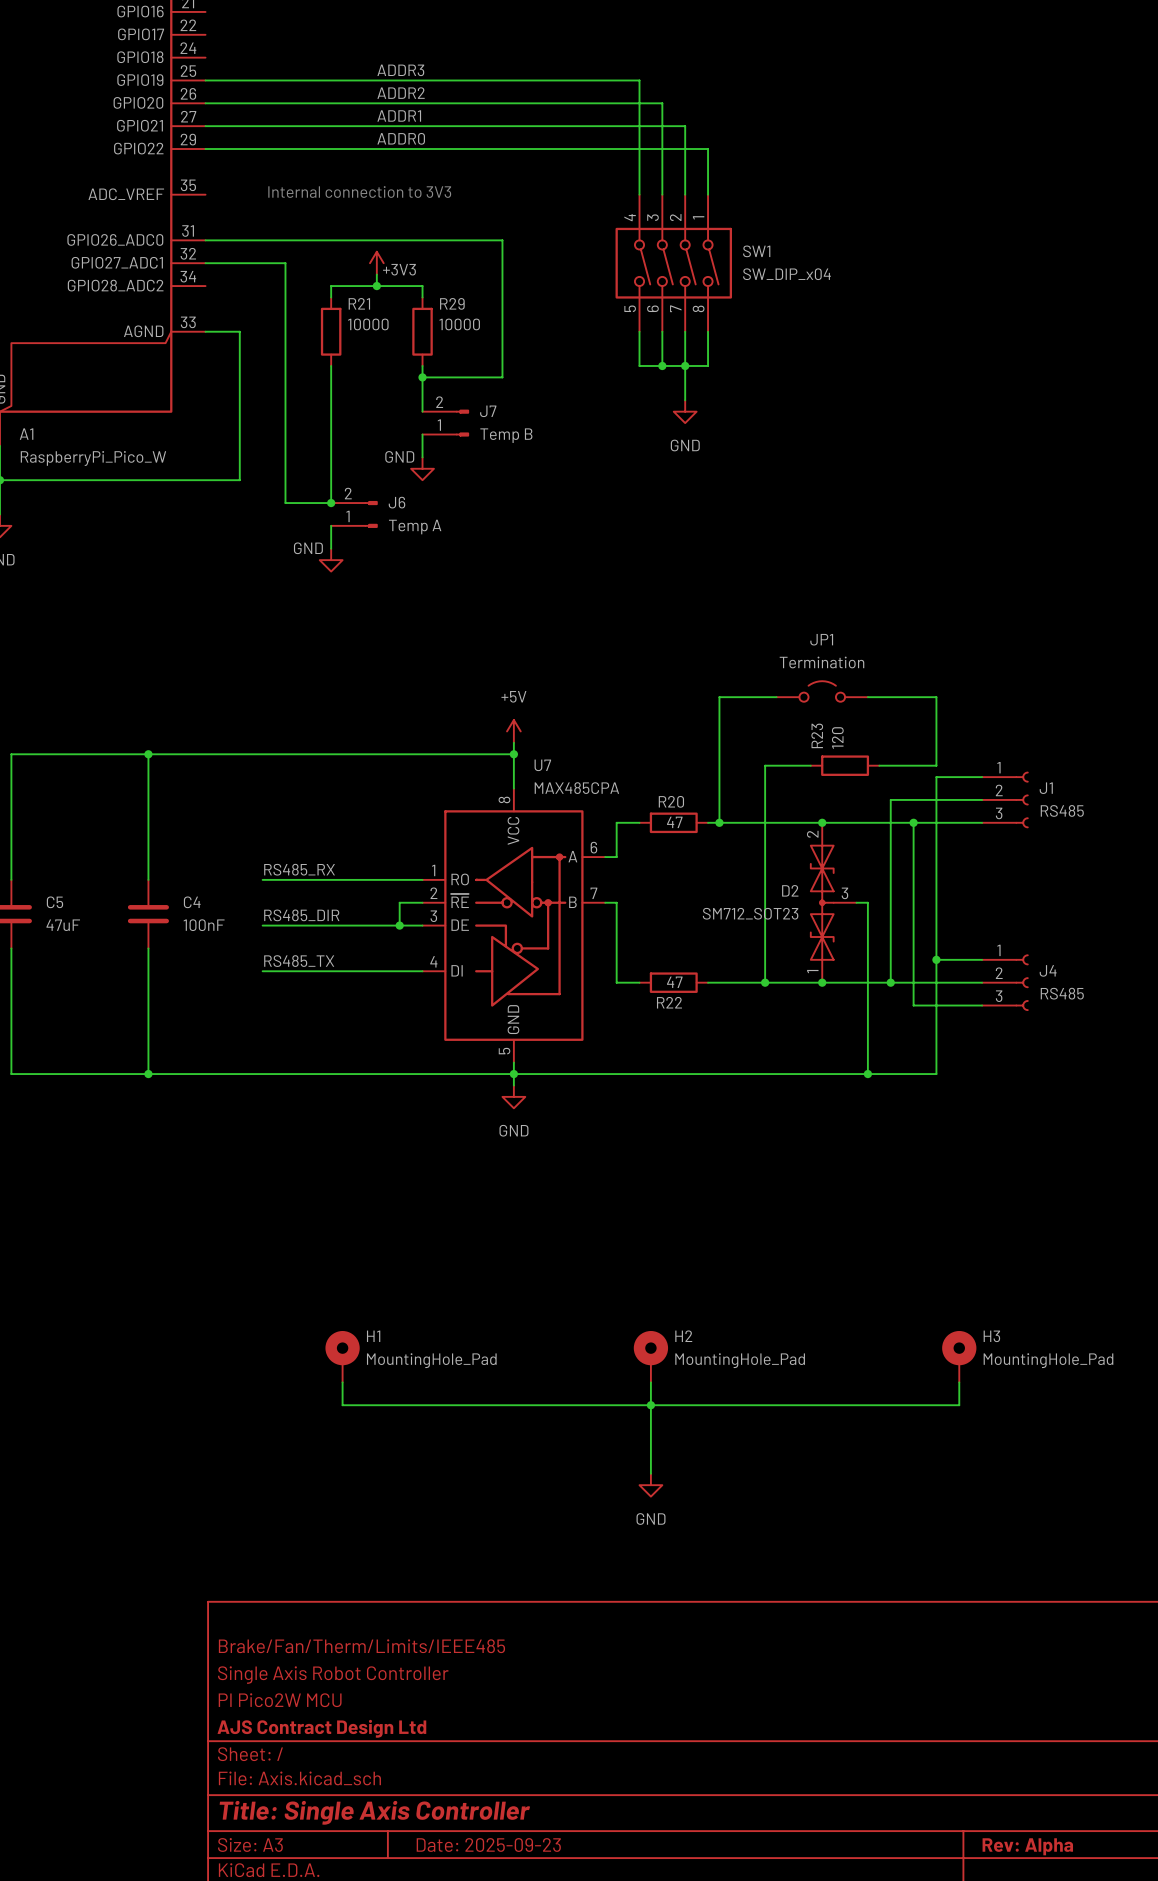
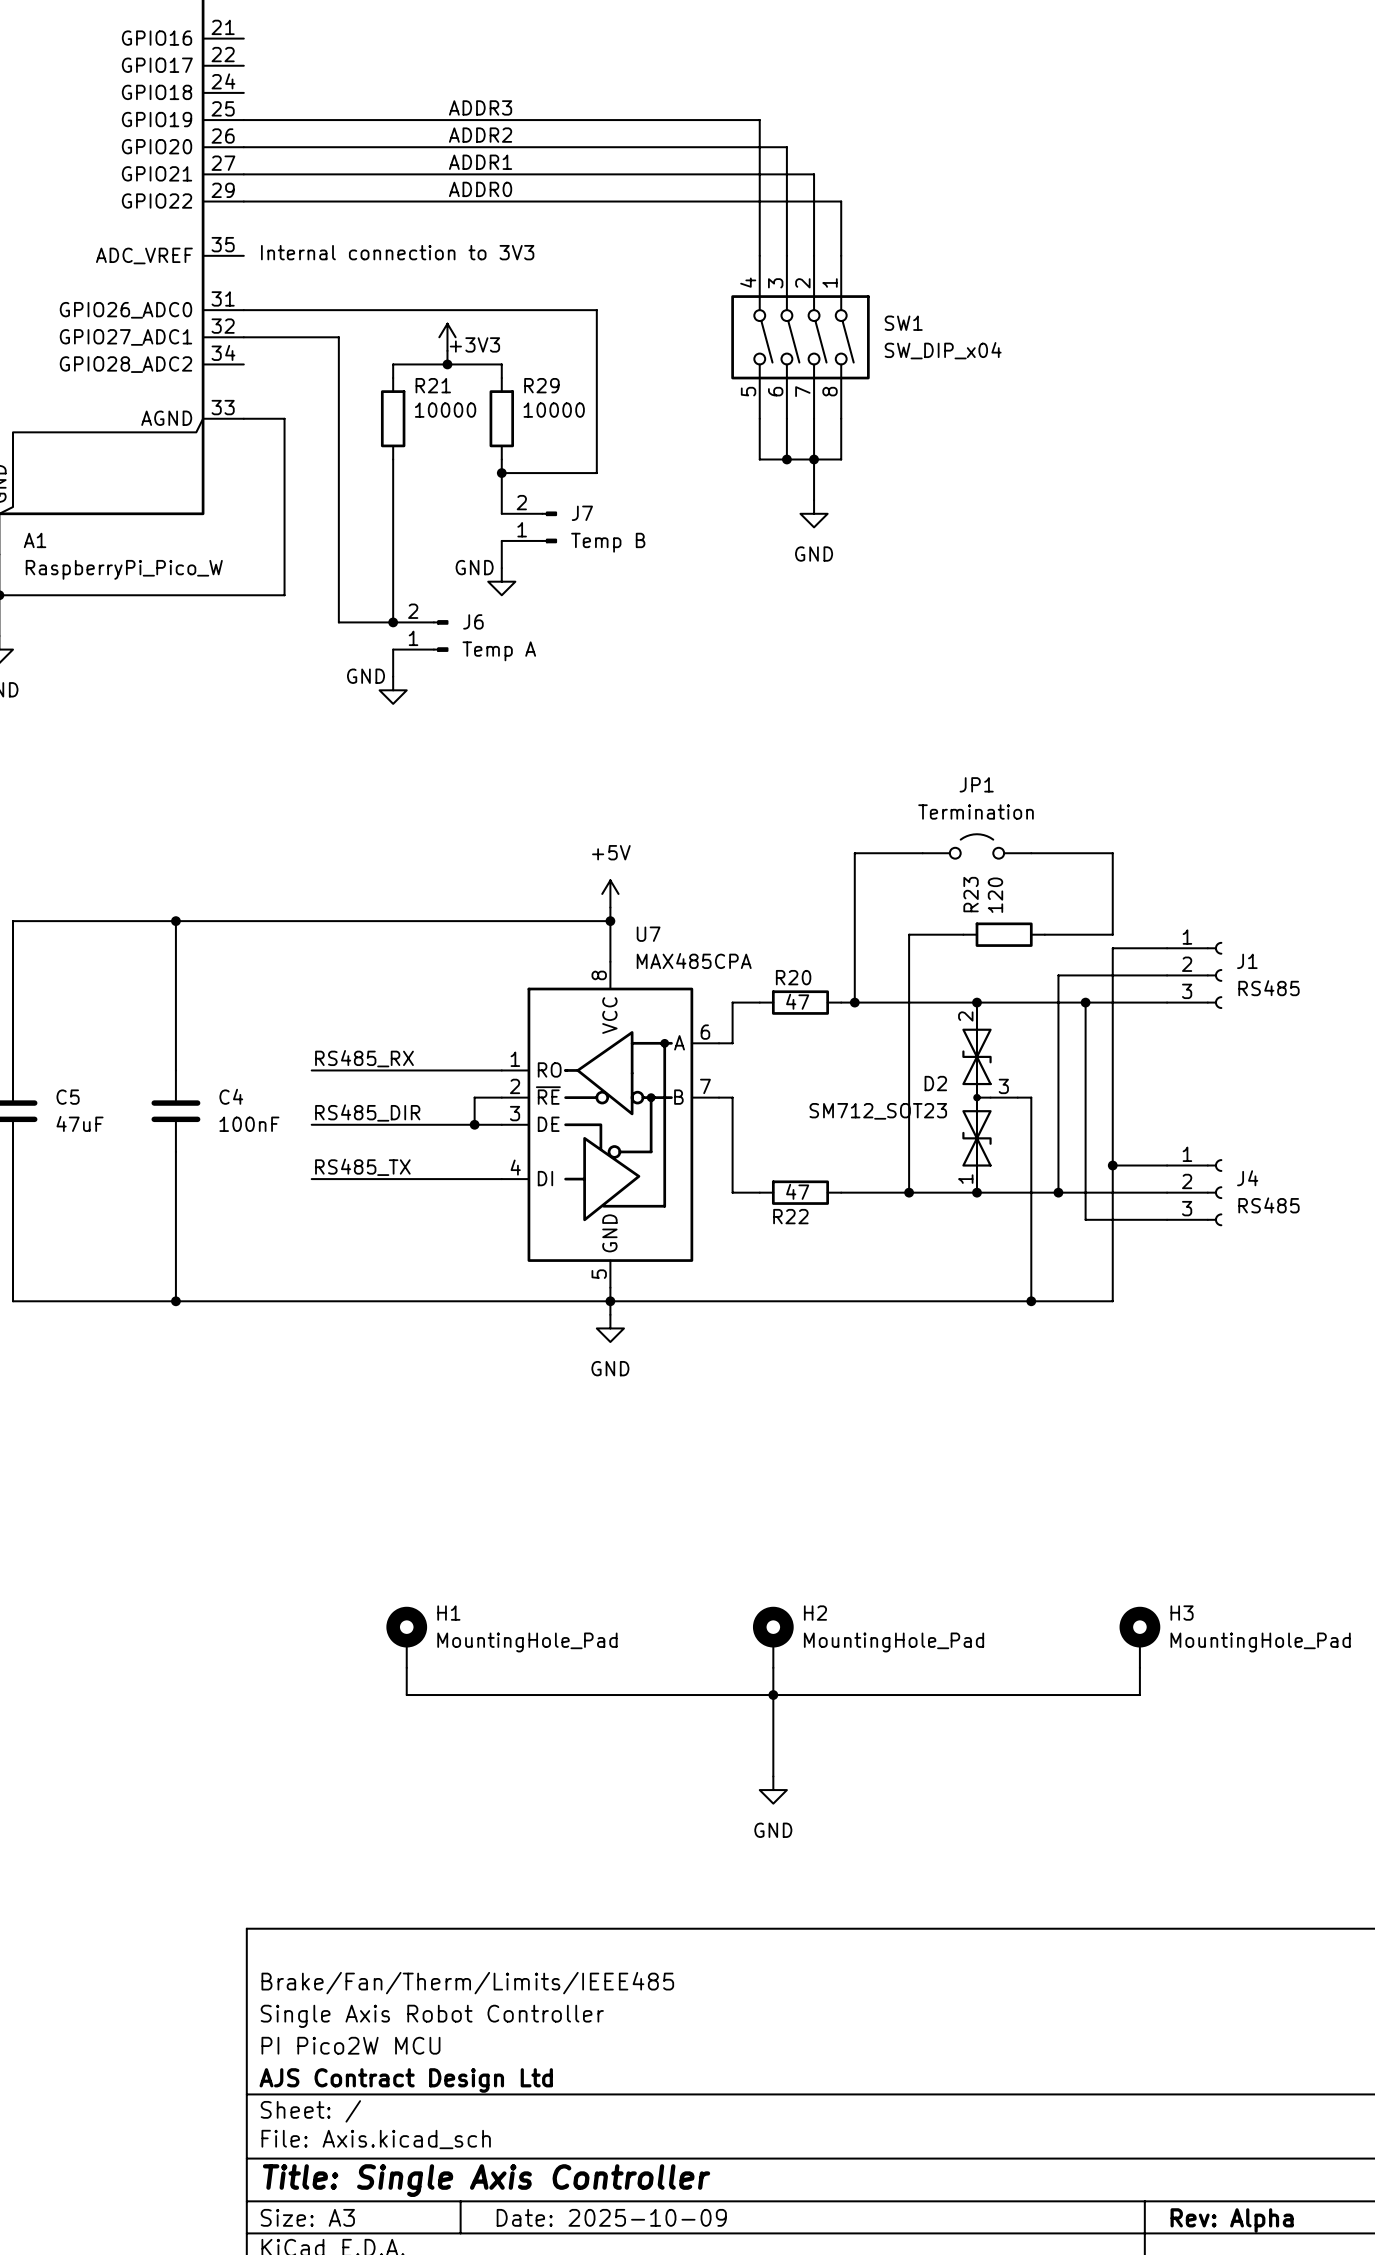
title block: Date: 2025-09-23 (488, 1845) -> Date: 2025-10-09 (611, 2217)

